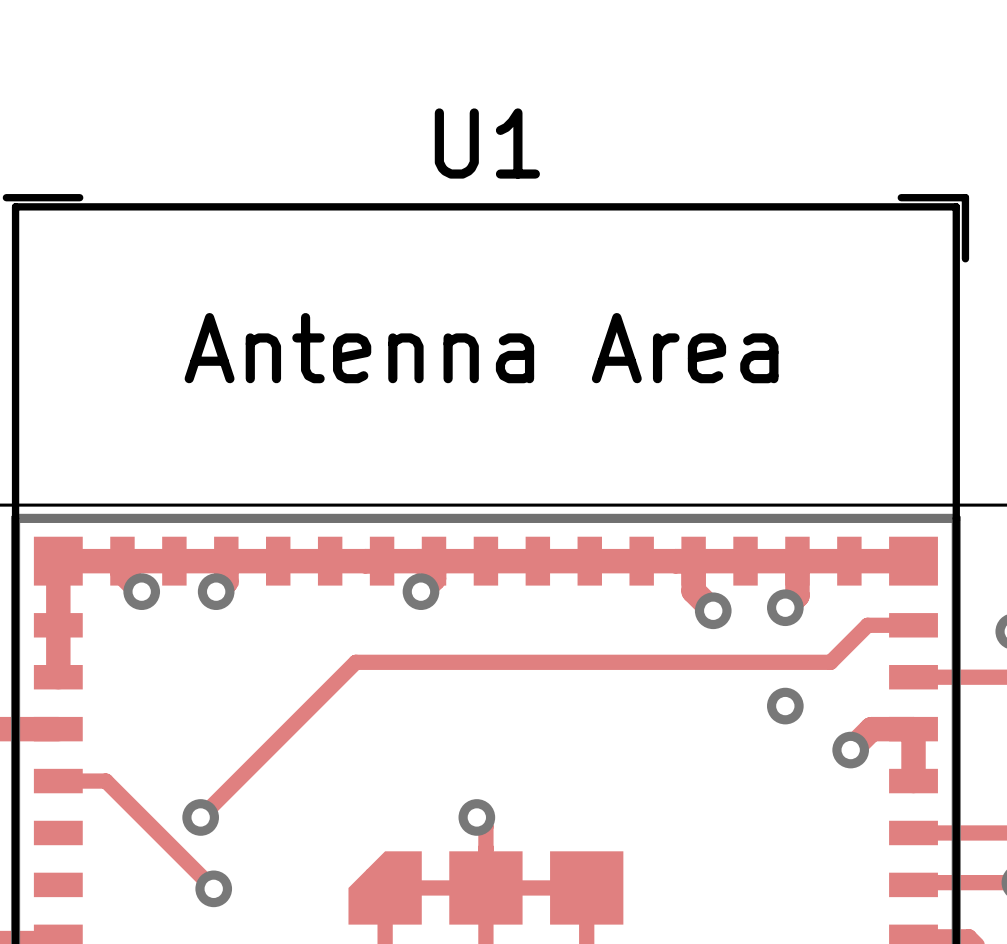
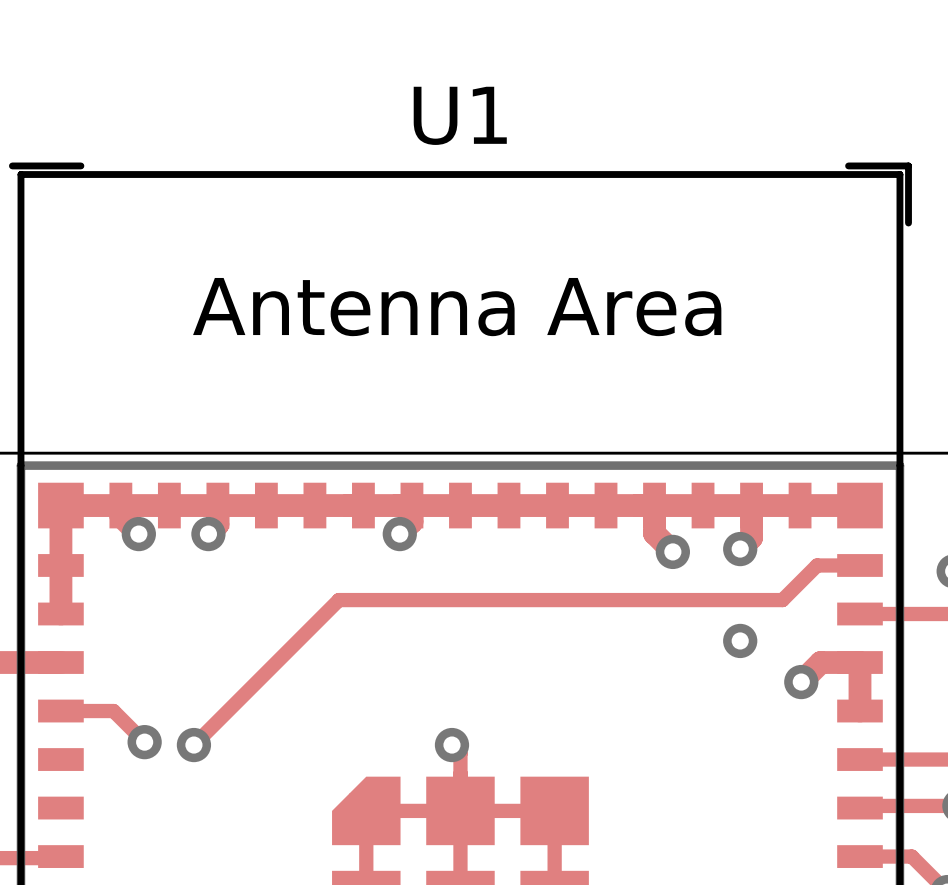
track: (105, 781) (213, 888) -> (105, 711) (113, 711) (144, 742)
via position: (213, 888) -> (144, 742)

